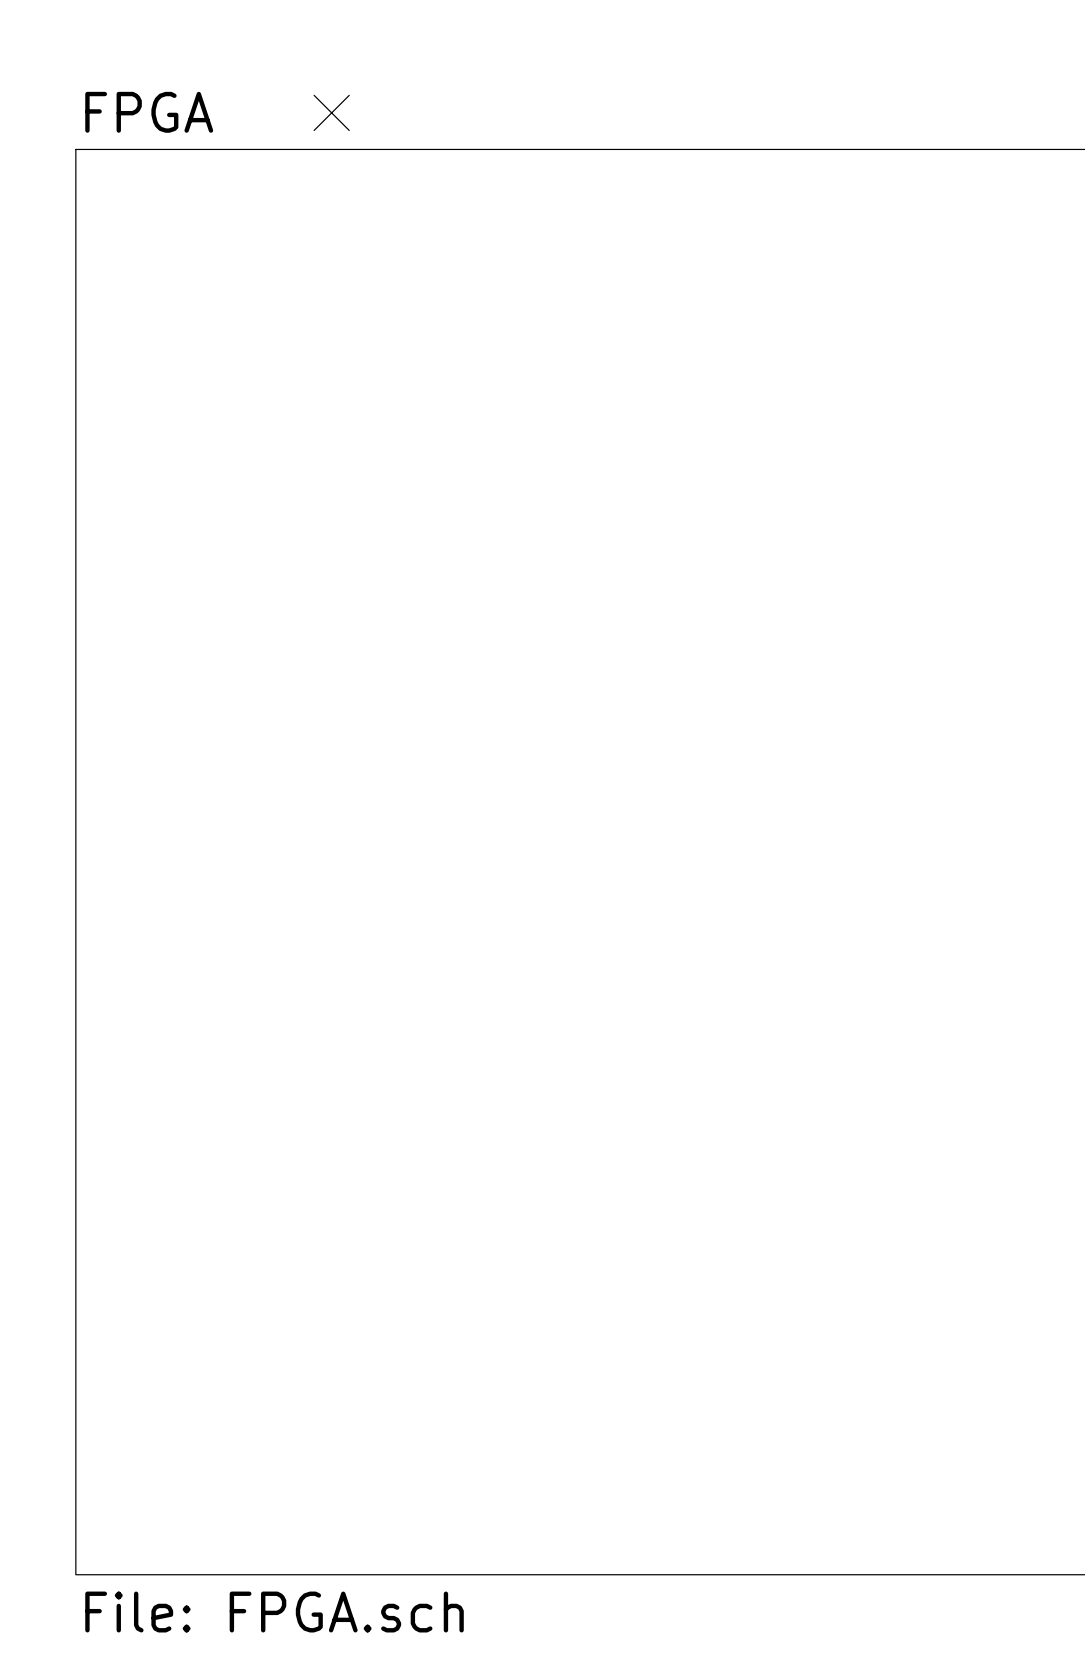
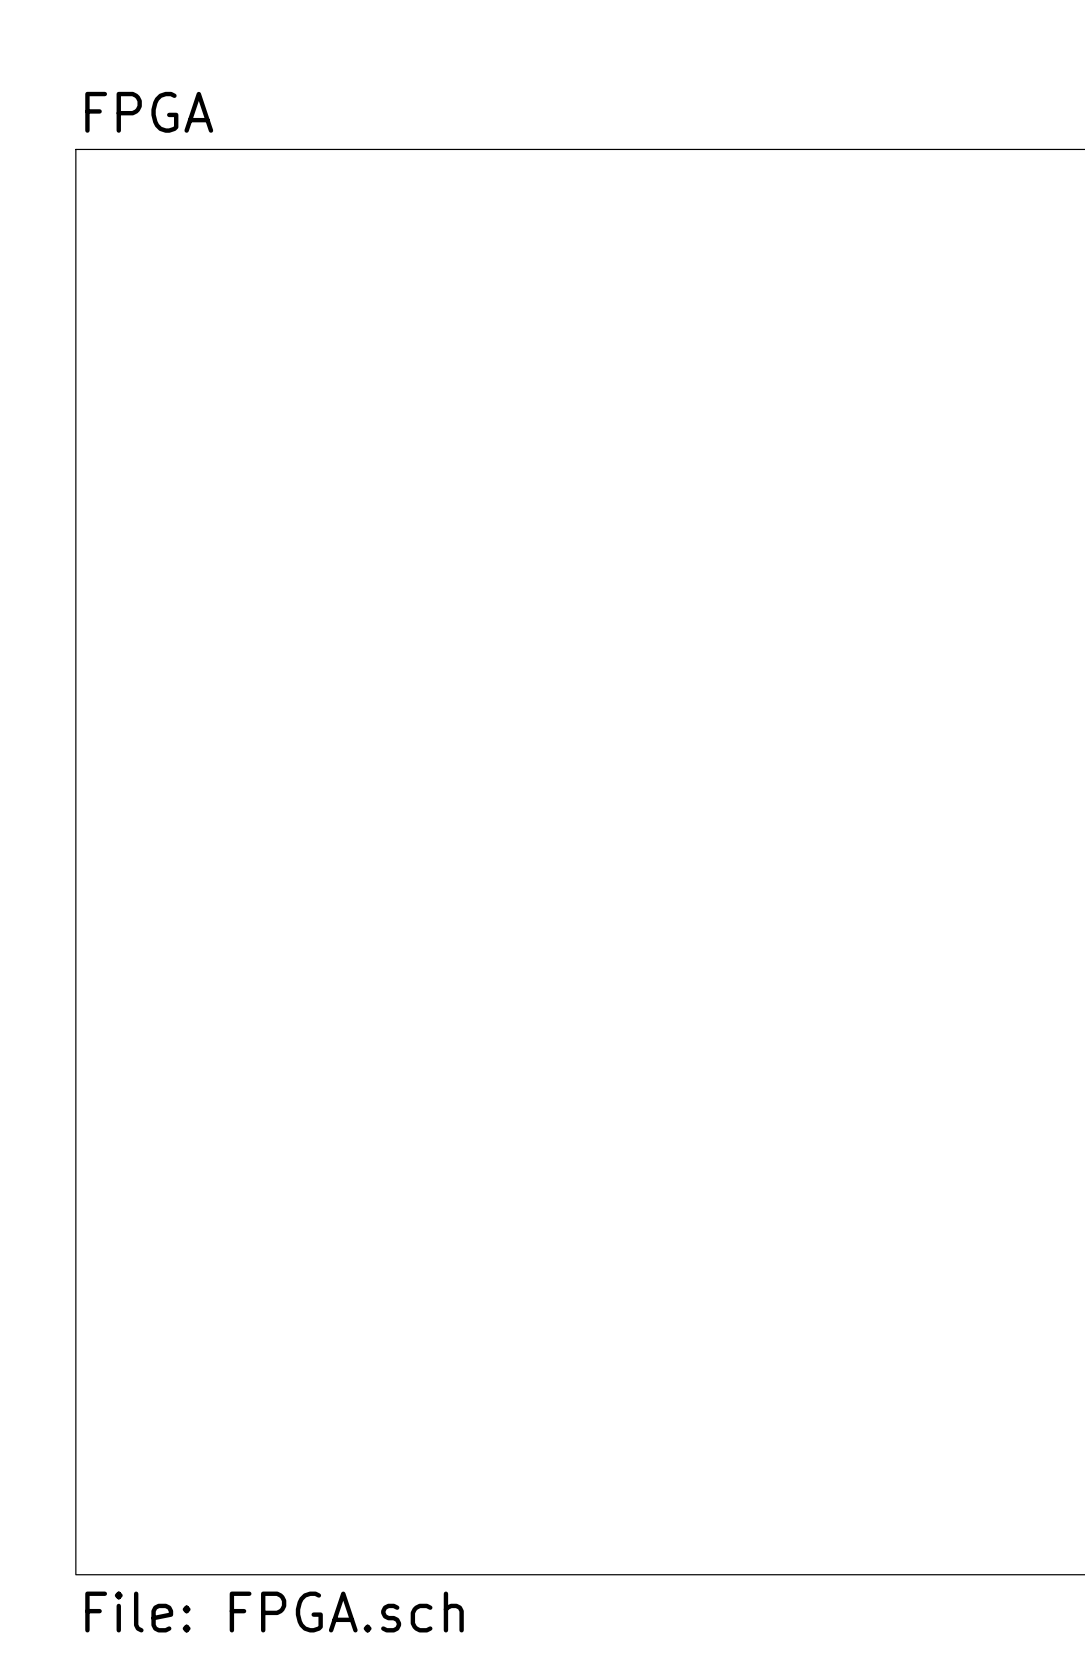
no-connect mark: (331, 112) -> none

